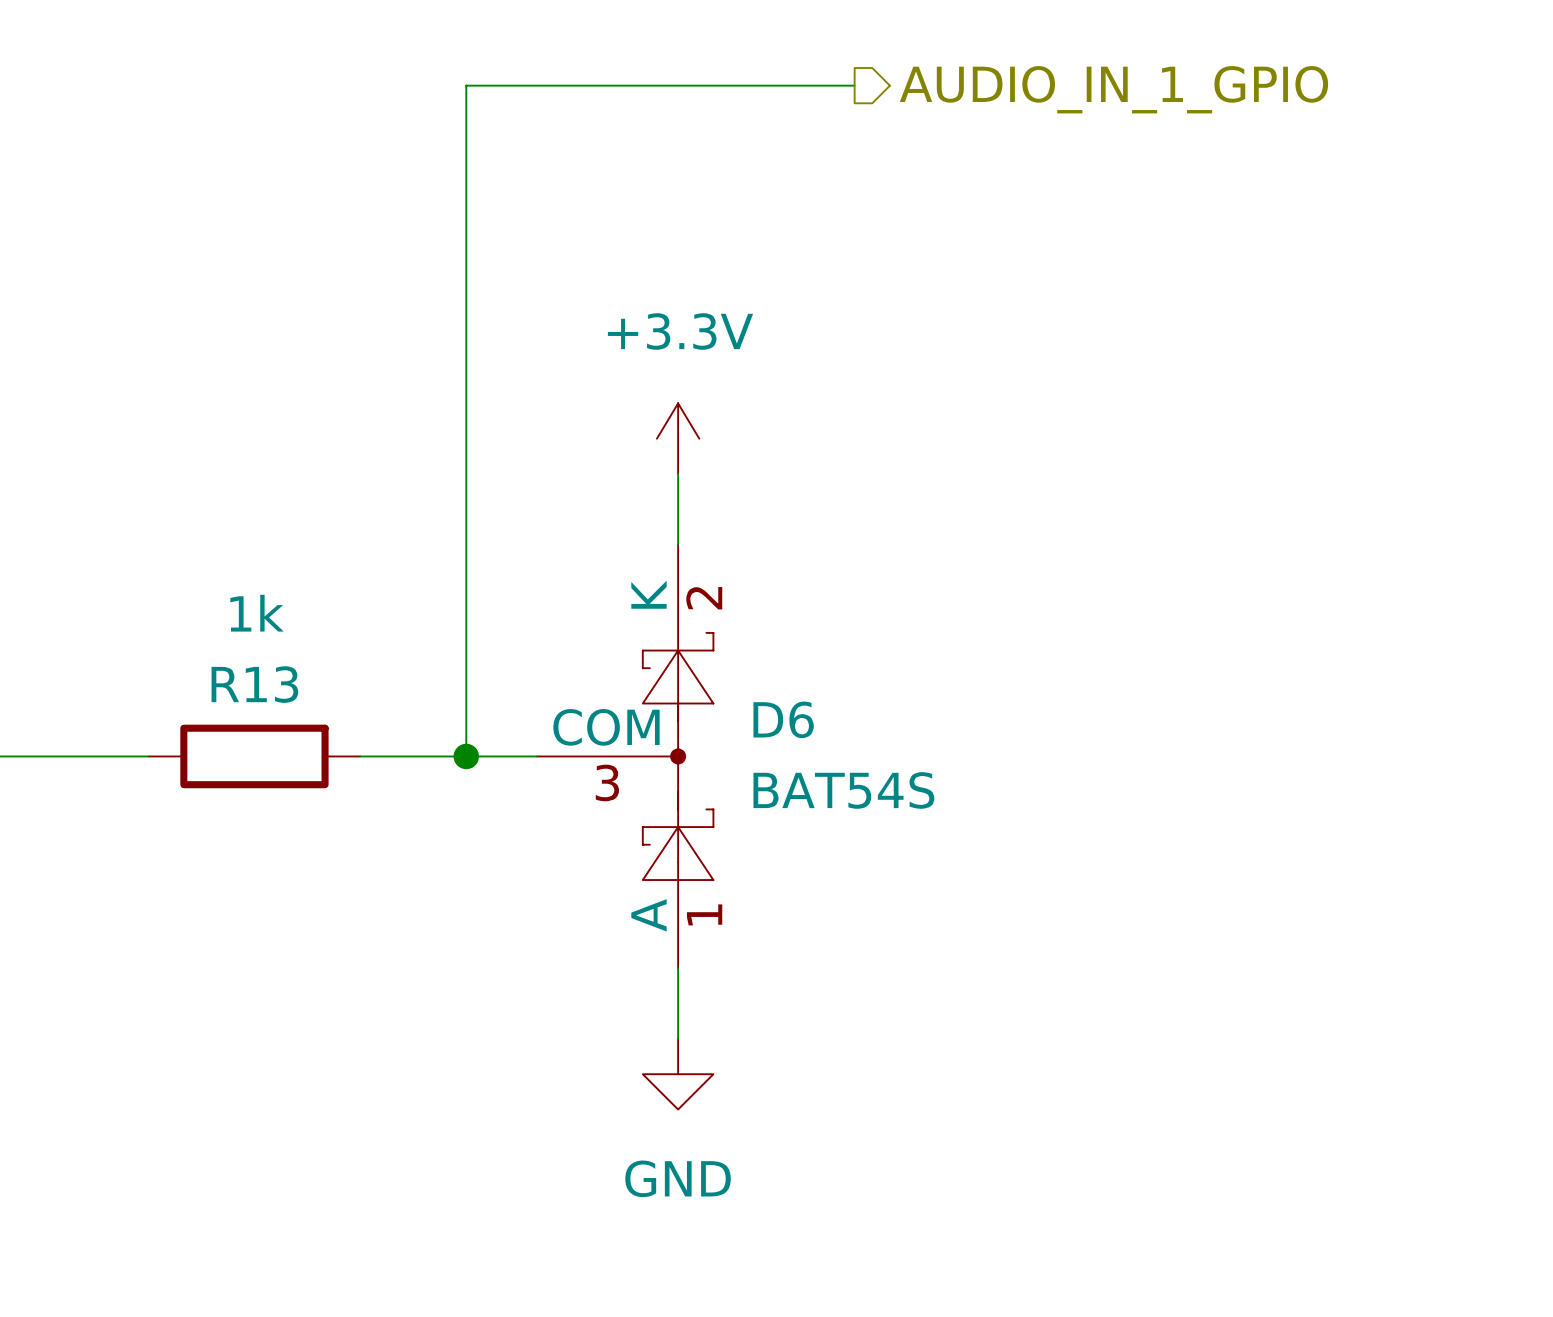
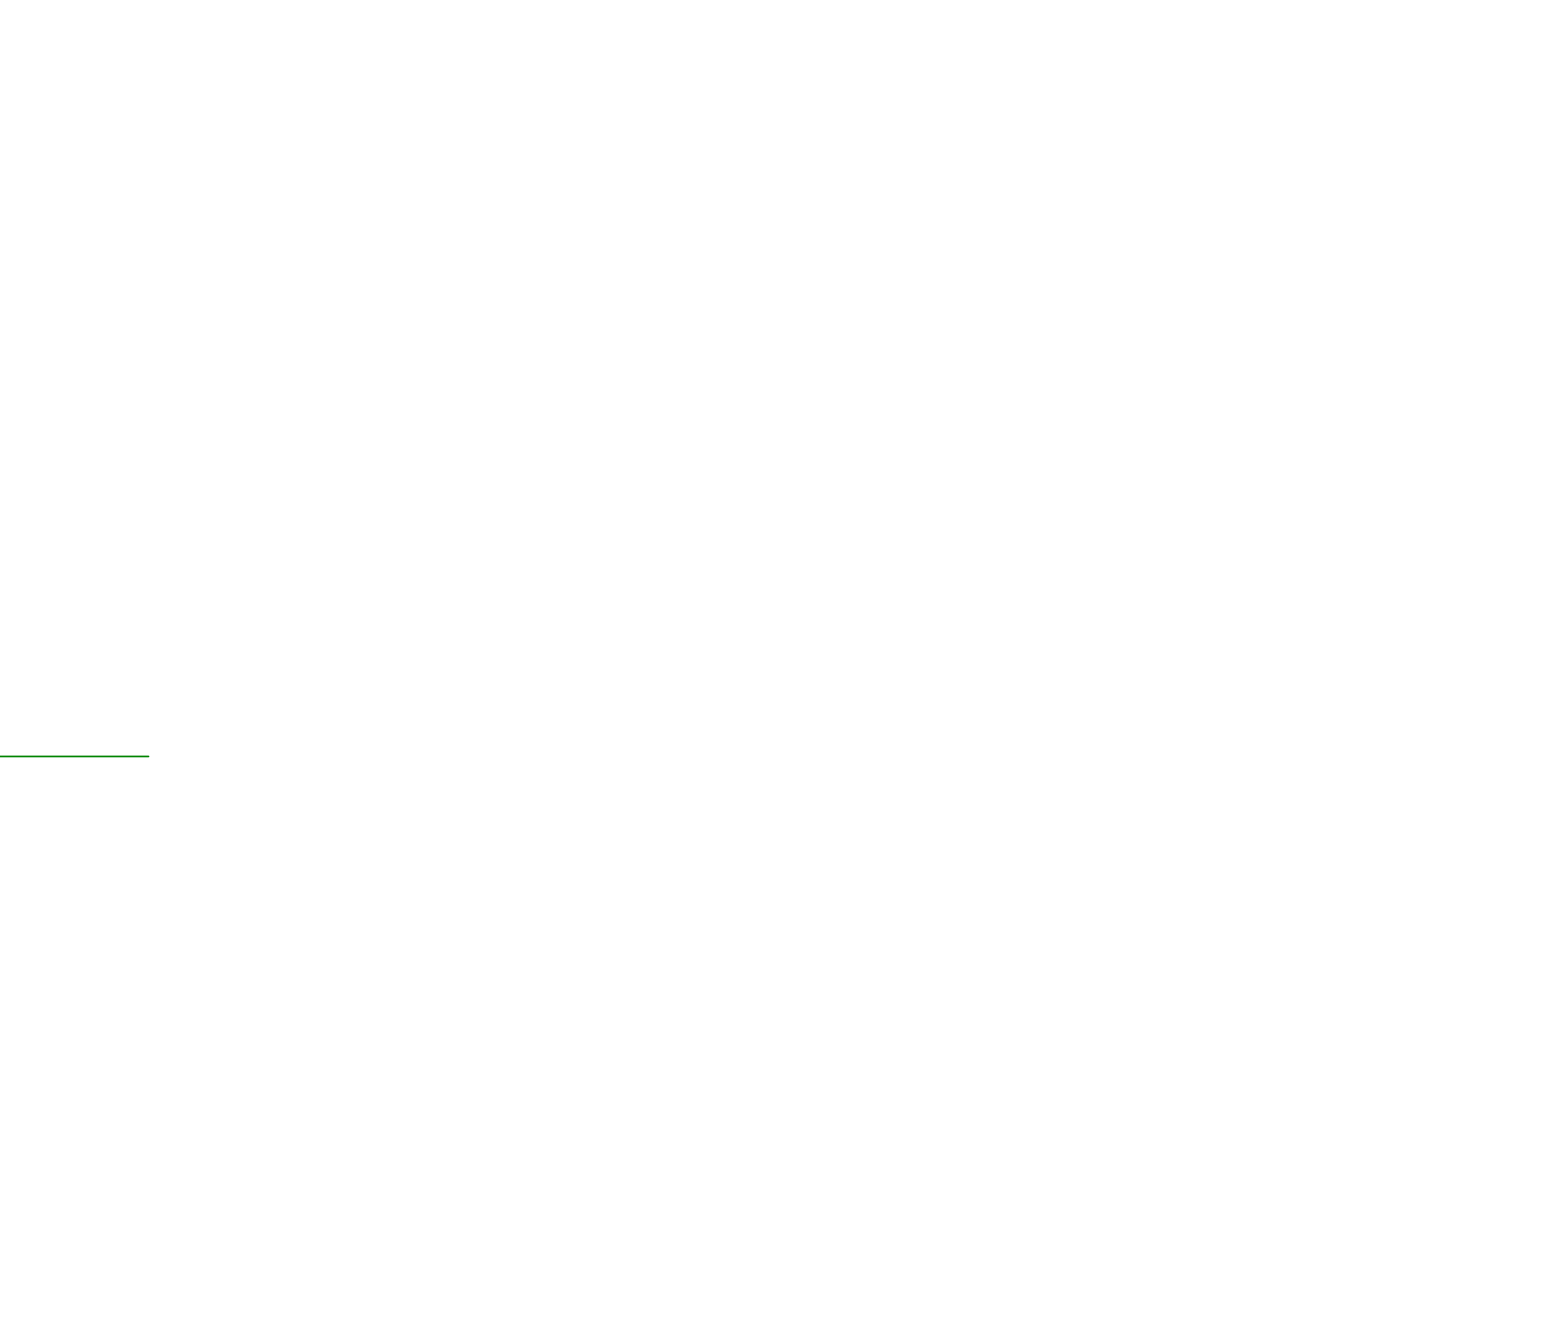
wire: (854, 85) (466, 85) (466, 756) -> none
hierarchical label: AUDIO_IN_1_GPIO (1113, 89) -> none
power symbol: +3.3V (678, 438) -> none
wire: (678, 474) (678, 544) -> none
R13: 1k (254, 756) -> none
wire: (360, 756) (536, 756) -> none
junction: (466, 756) -> none
D6: BAT54S (625, 756) -> none
wire: (678, 968) (678, 1038) -> none
power symbol: GND (678, 1074) -> none

